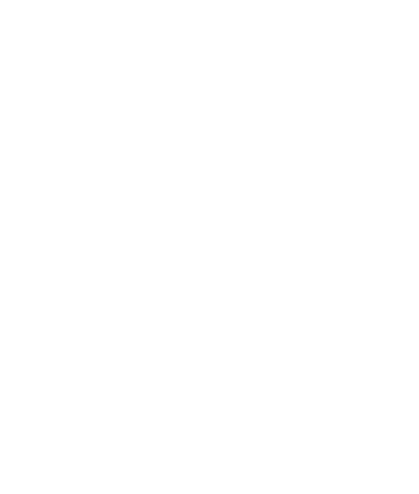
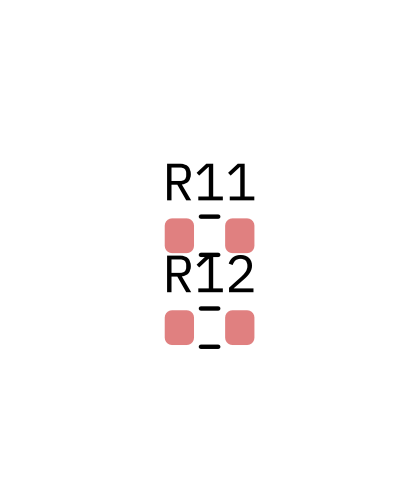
R11: none -> (209, 235)
R12: none -> (209, 327)

